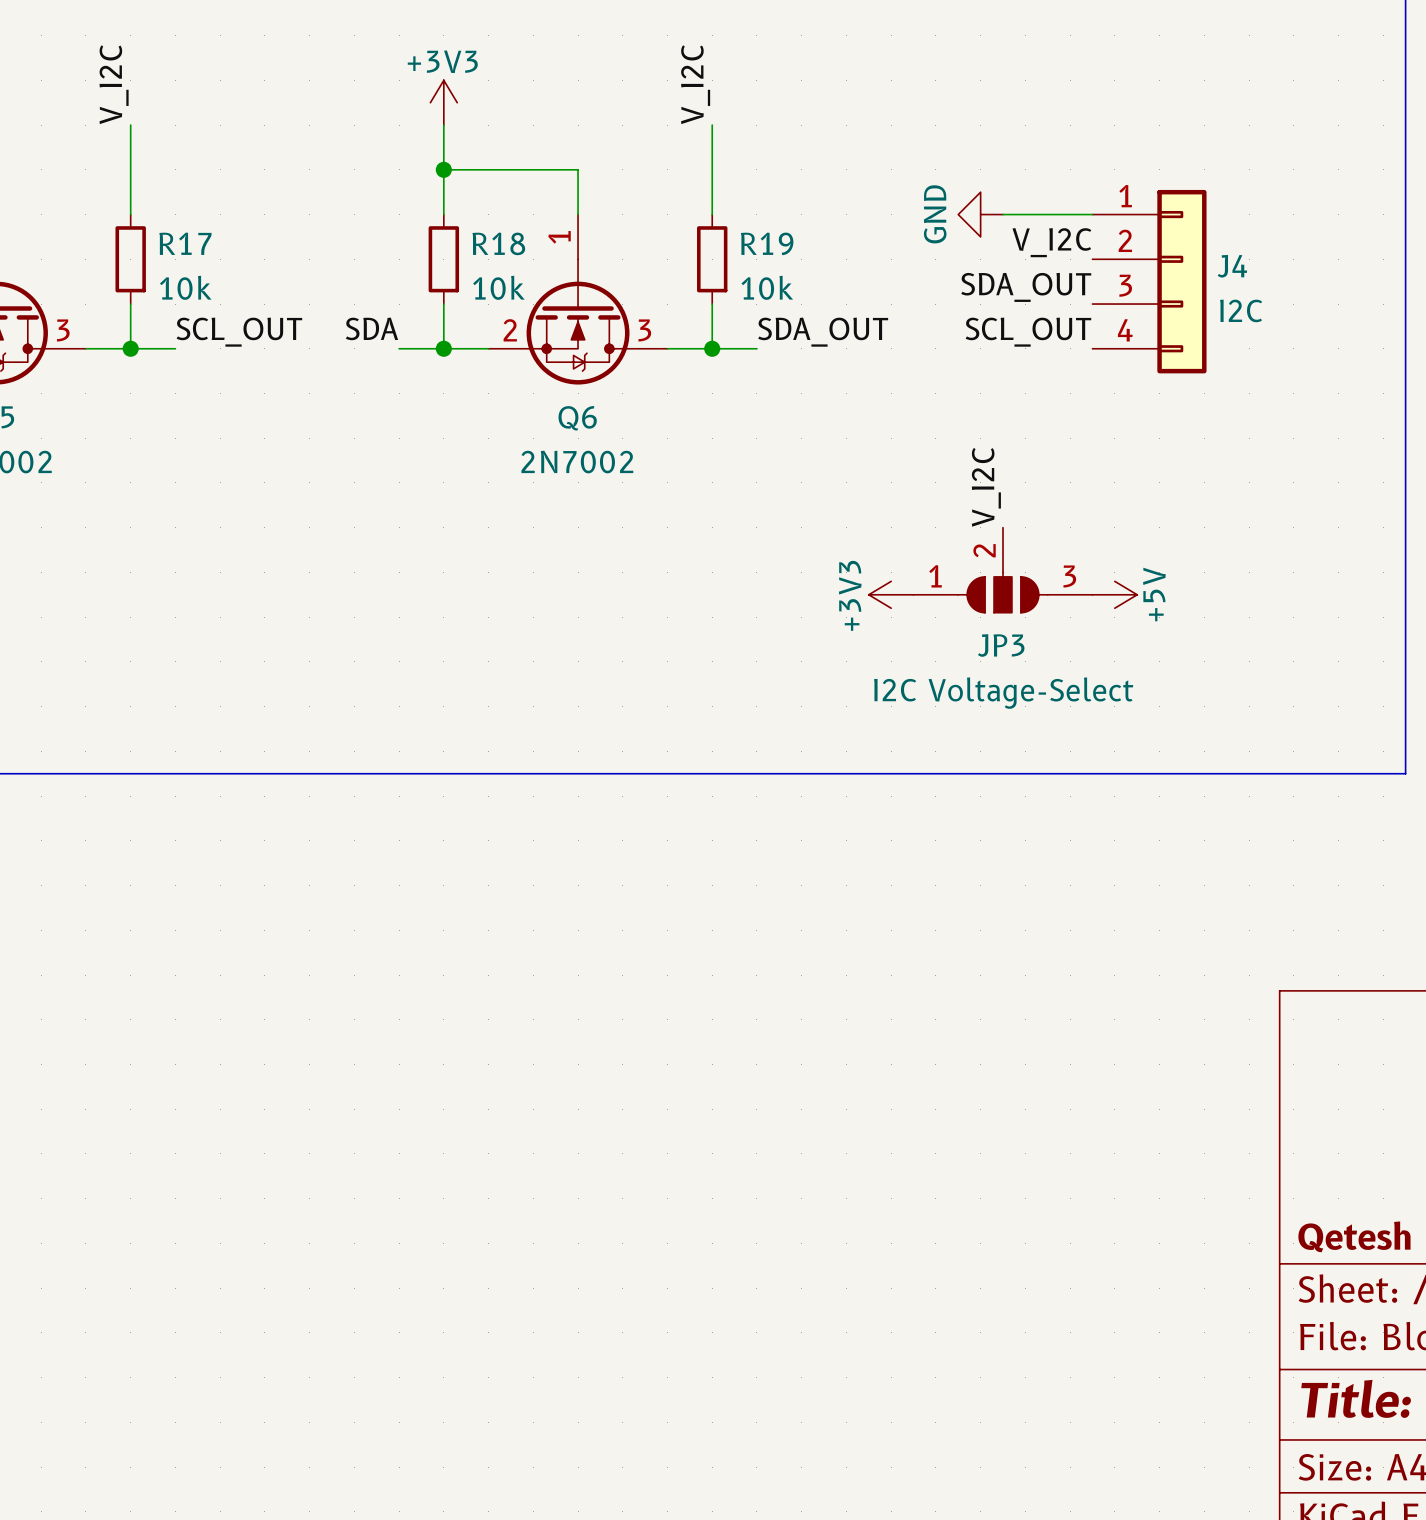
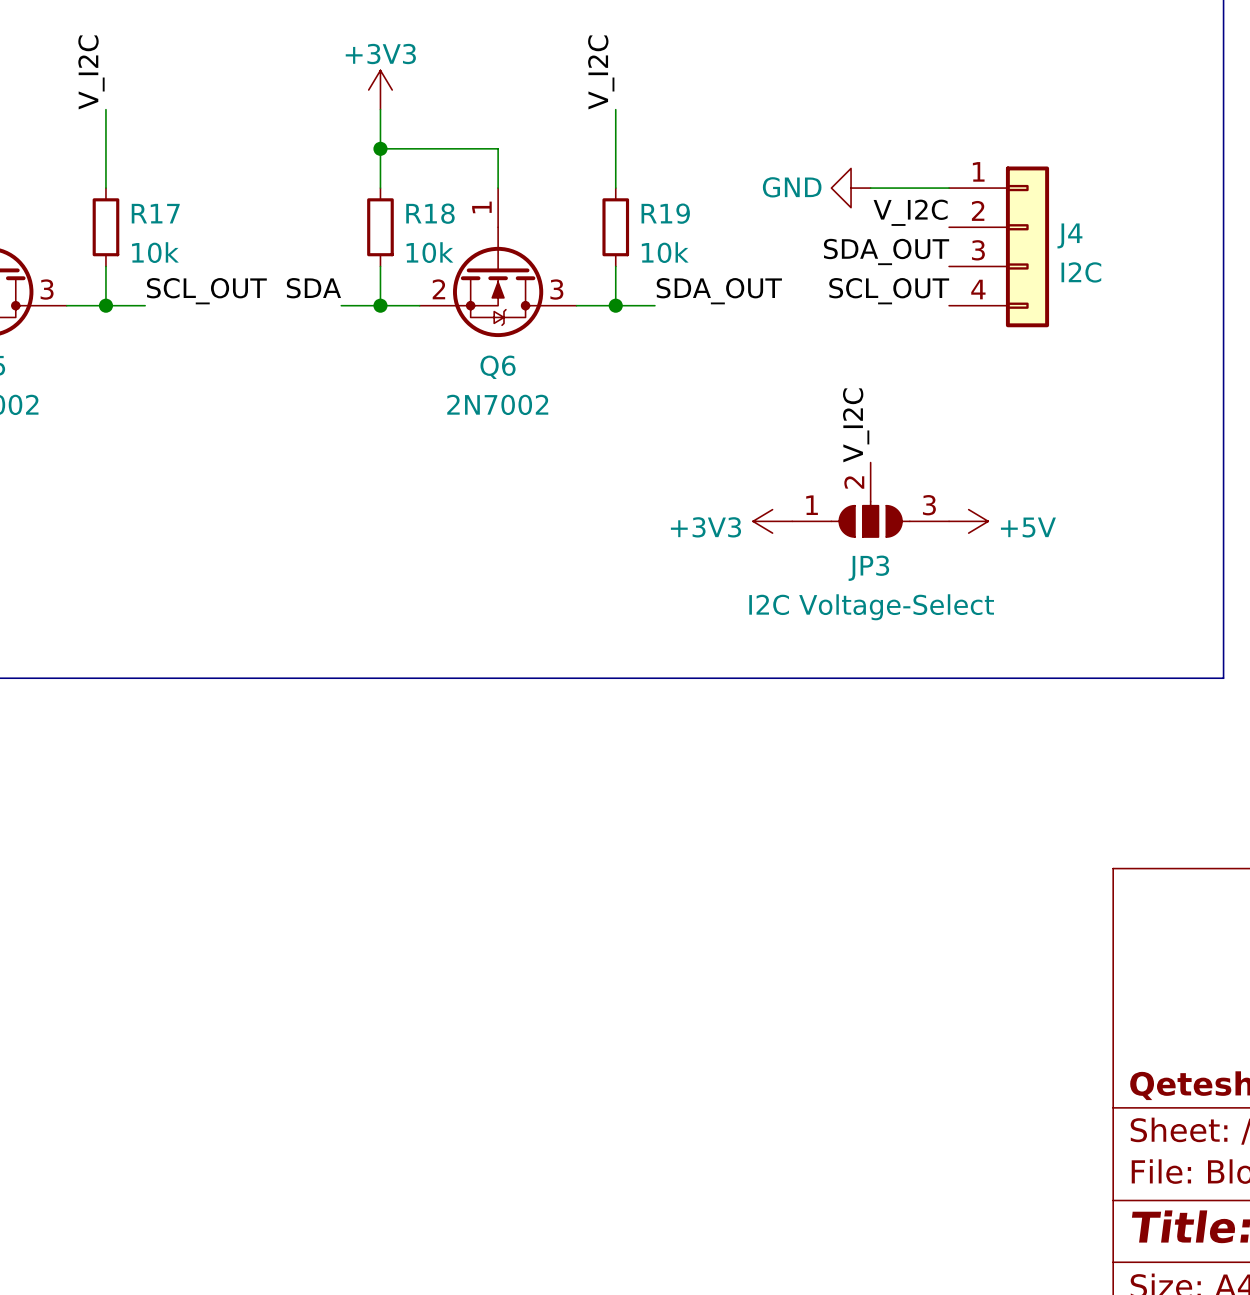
power symbol text rotation: 0° (935, 214) -> 90° clockwise (792, 187)
power symbol text rotation: 0° (1154, 594) -> 90° clockwise (1028, 527)
power symbol text rotation: 0° (850, 595) -> 90° clockwise (705, 527)

